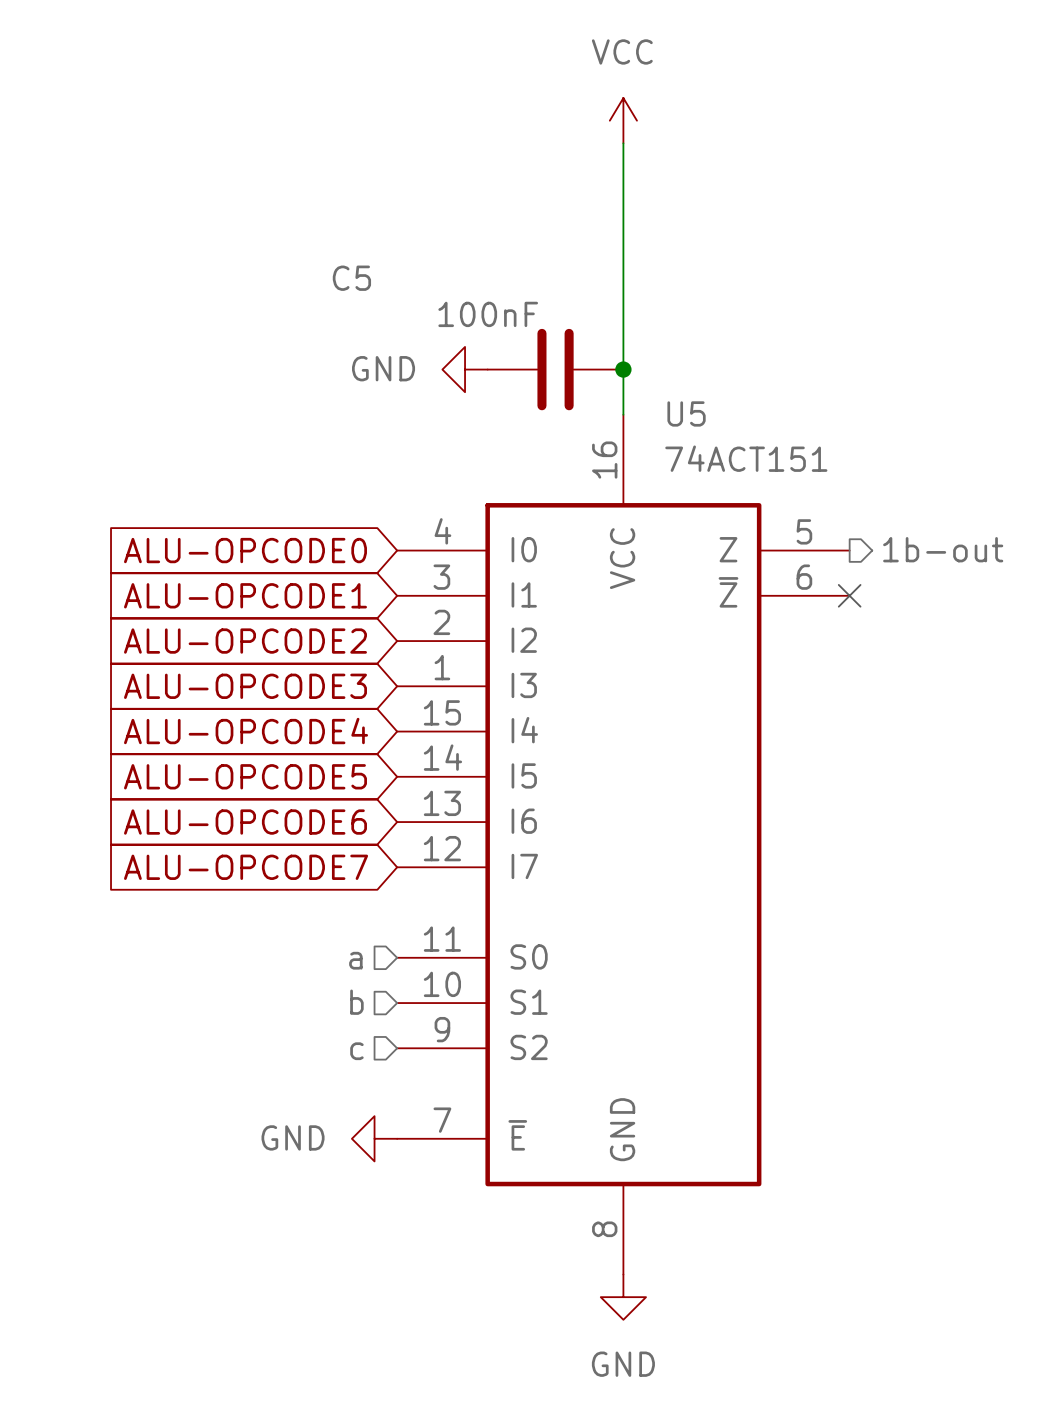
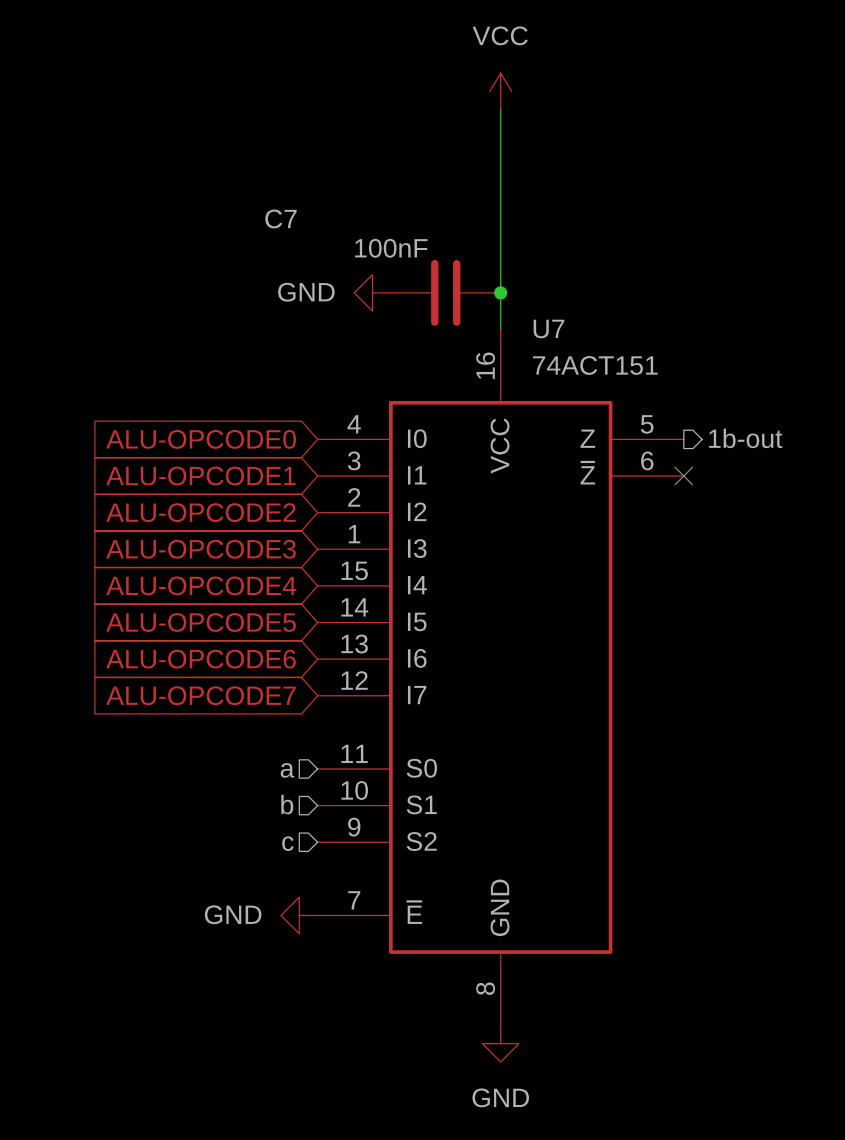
C5 name: C5 (351, 278) -> C7 (281, 218)
U5 name: U5 (686, 413) -> U7 (548, 328)

